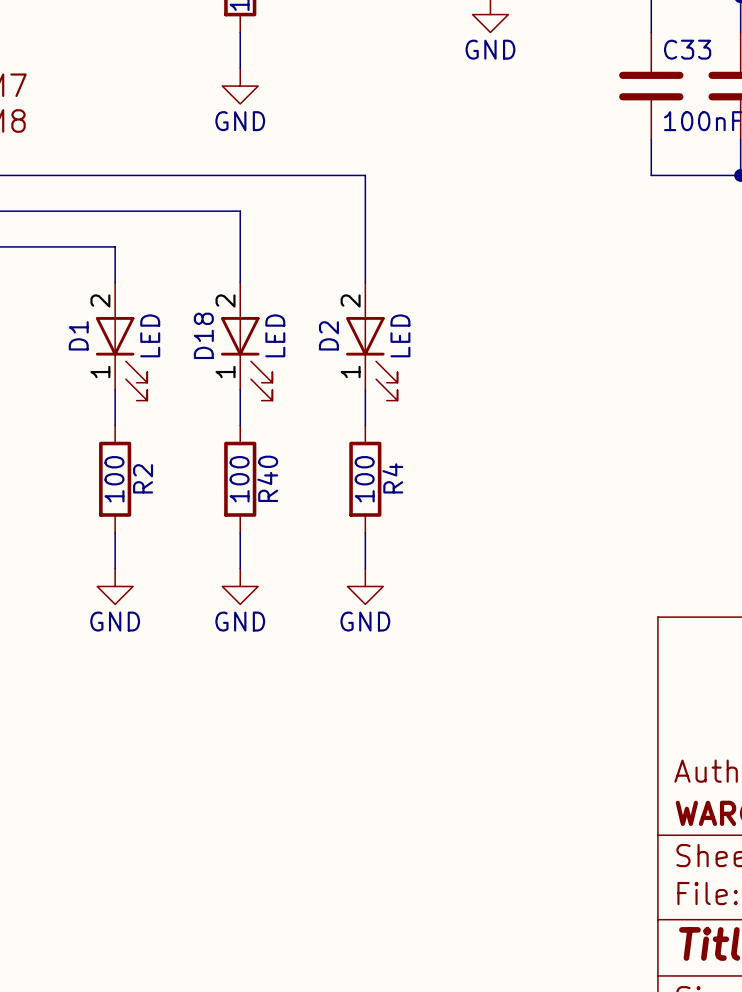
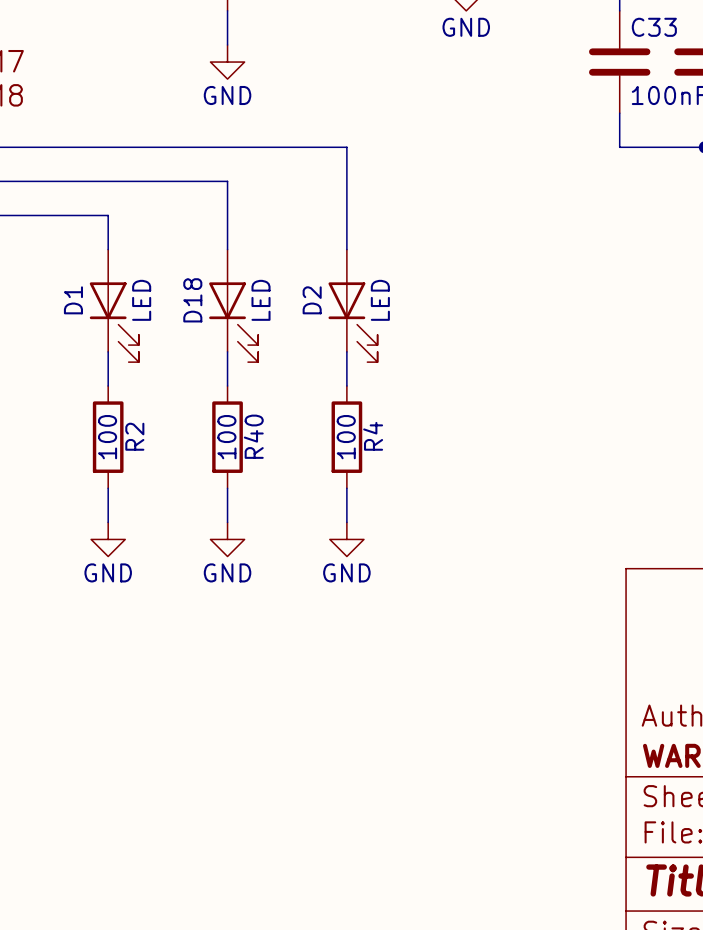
D1 pin number: 2 (100, 300) -> none
D18 pin number: 2 (225, 300) -> none
D2 pin number: 2 (350, 300) -> none
D1 pin number: 1 (100, 372) -> none
D18 pin number: 1 (225, 372) -> none
D2 pin number: 1 (350, 372) -> none

